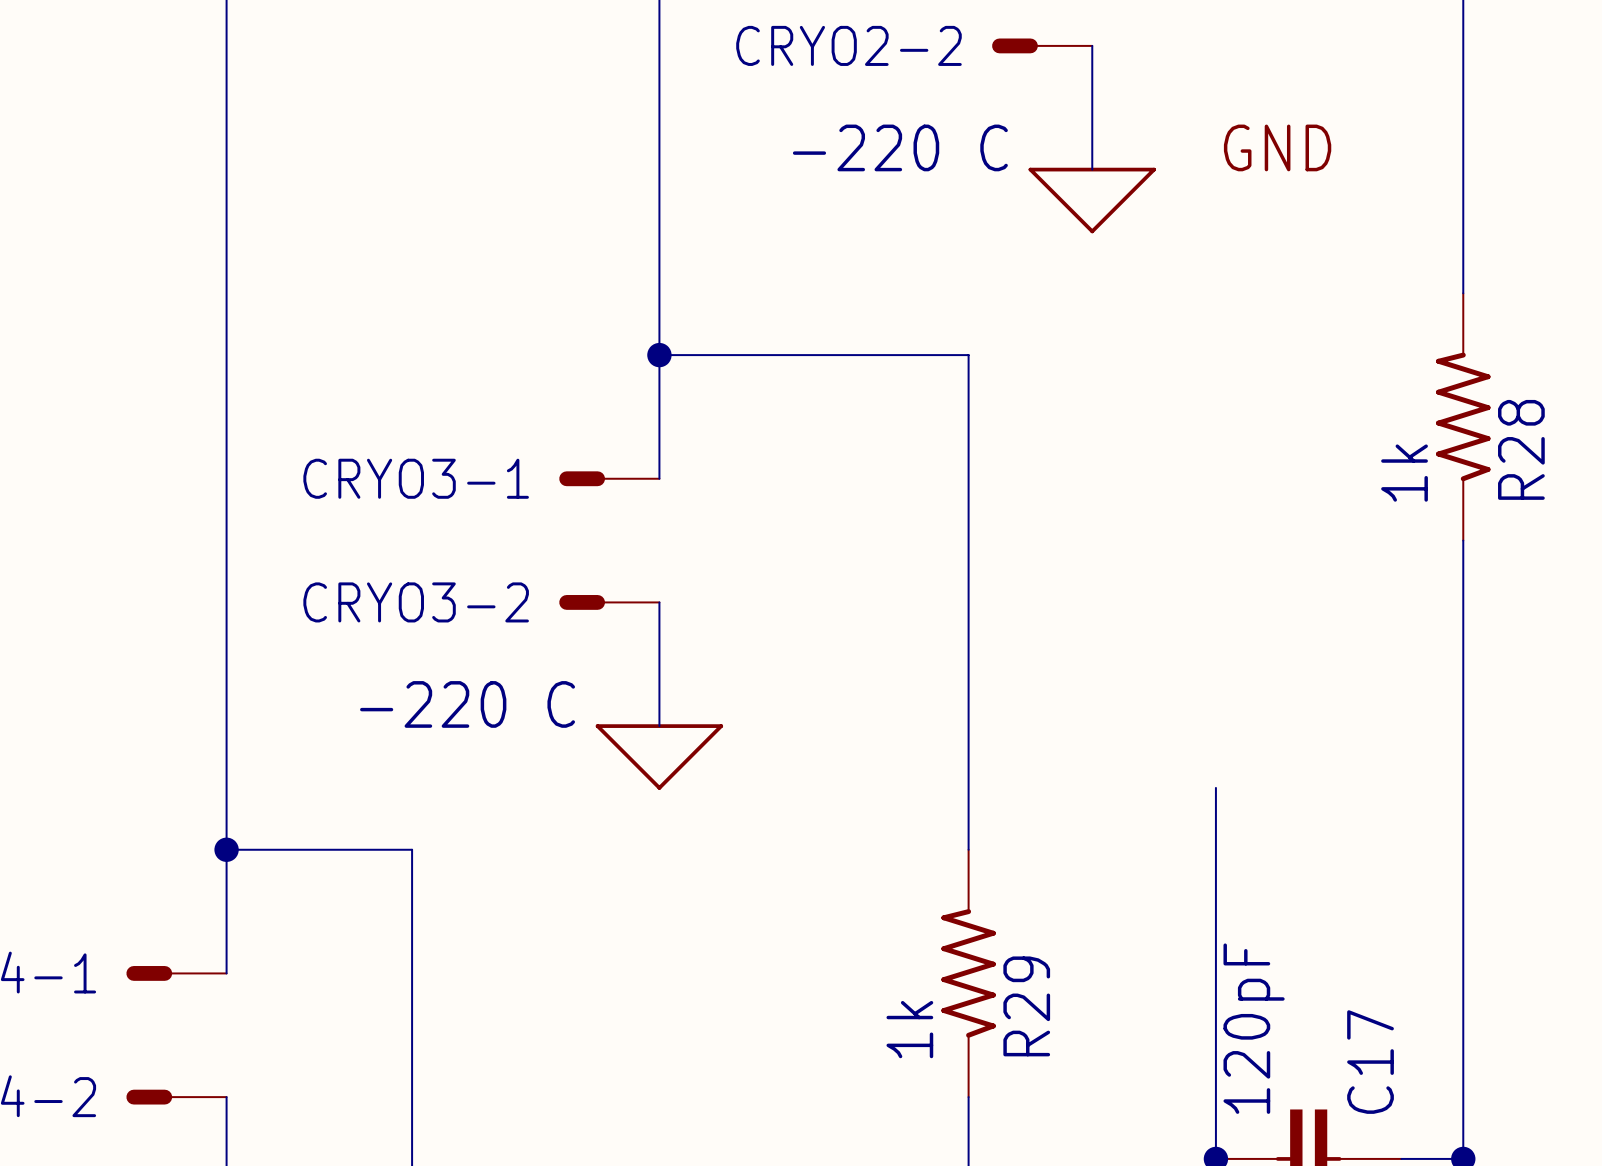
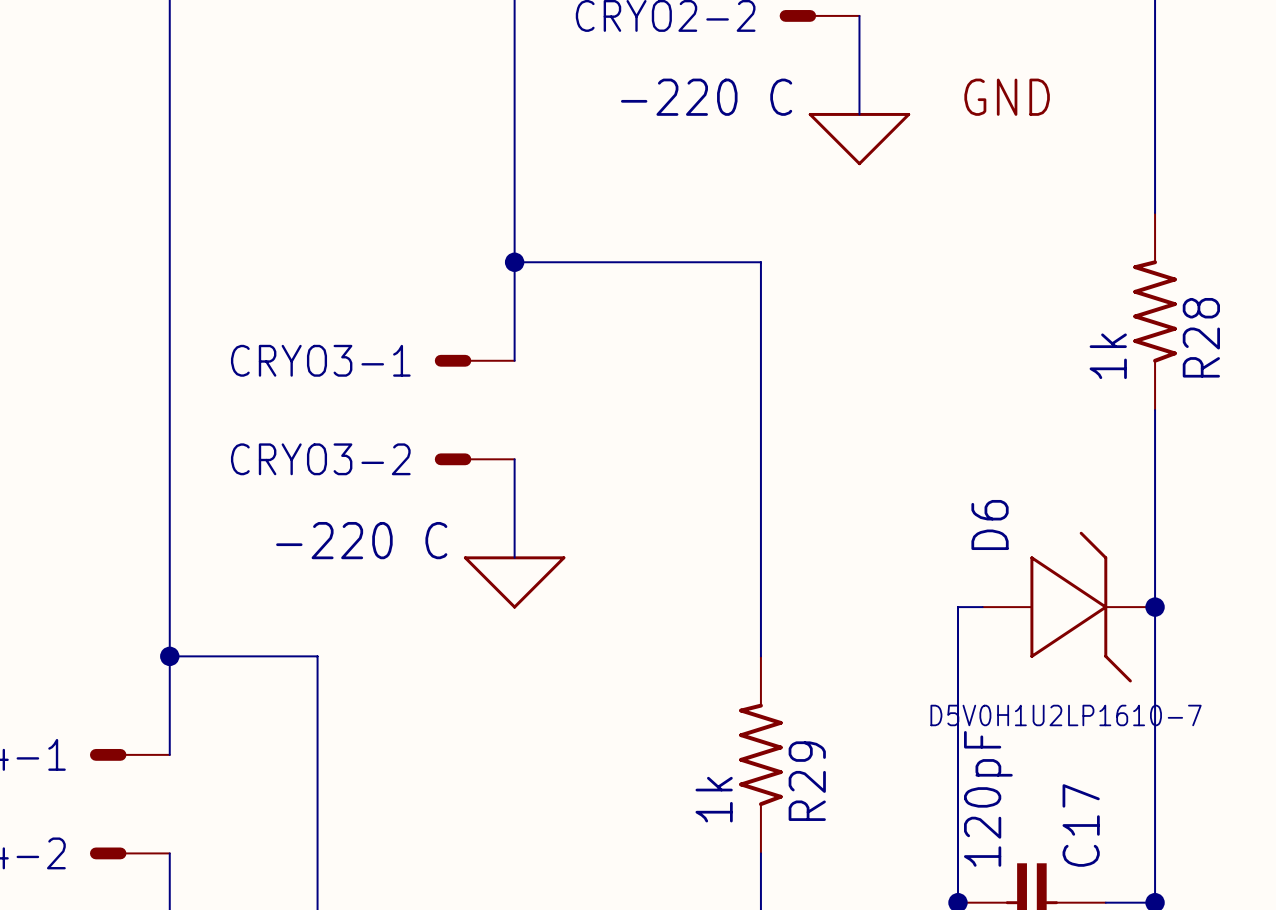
wire: none -> (958, 607) (982, 607)
D6: none -> (1068, 607)
junction: none -> (1155, 607)

